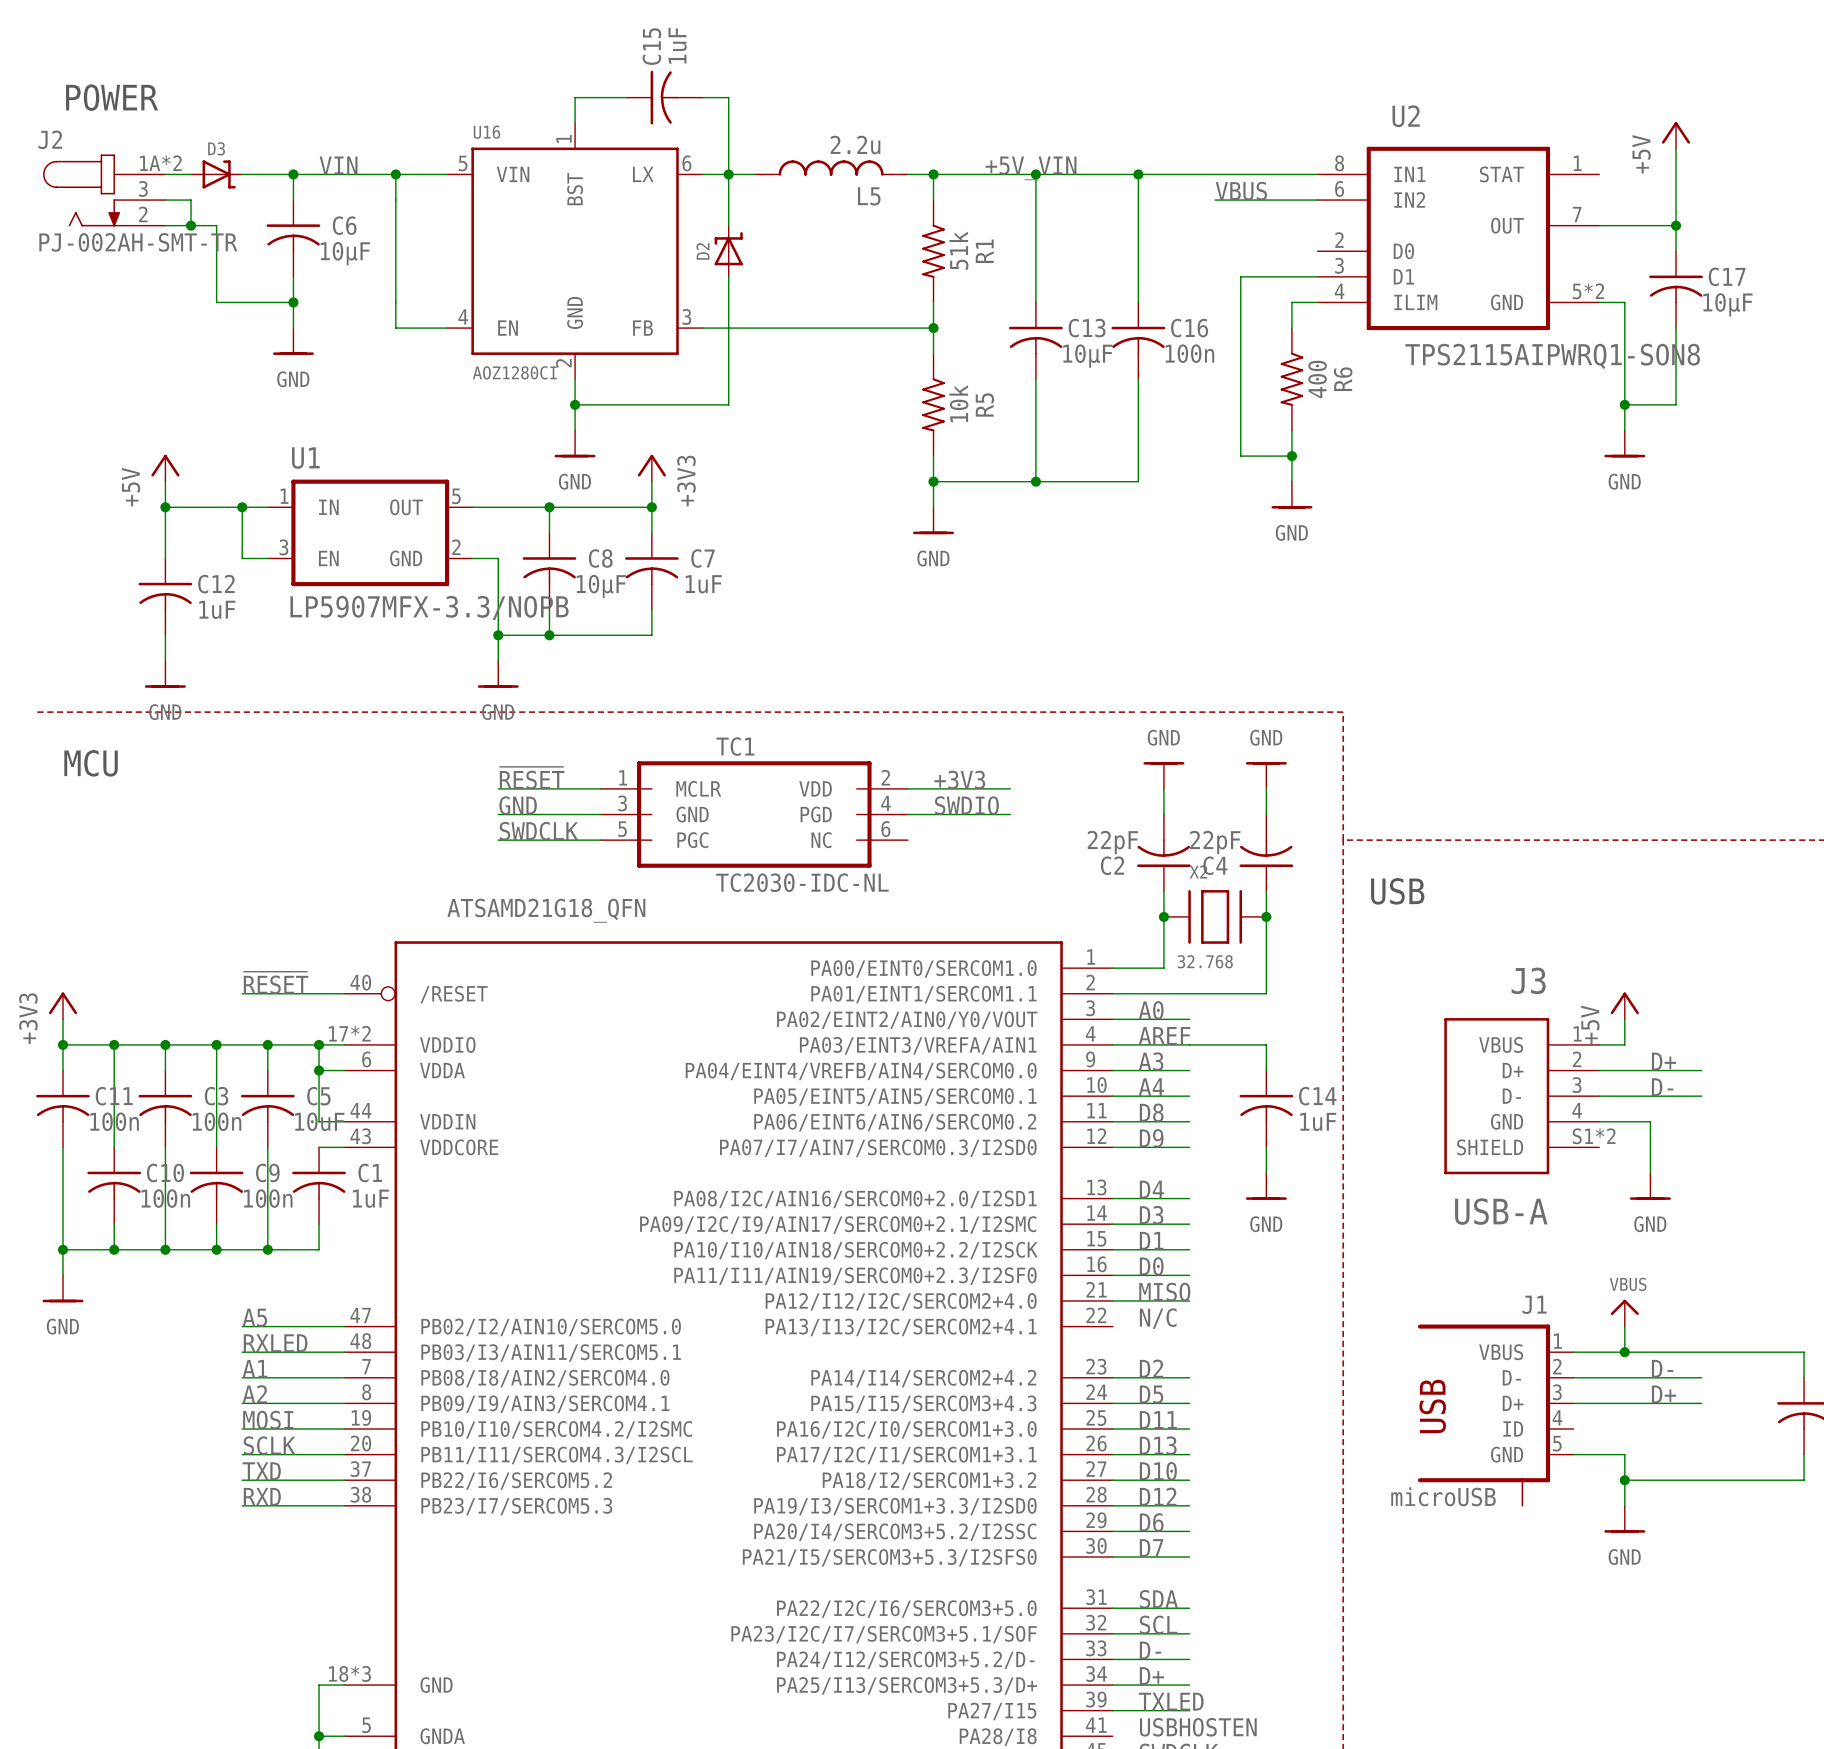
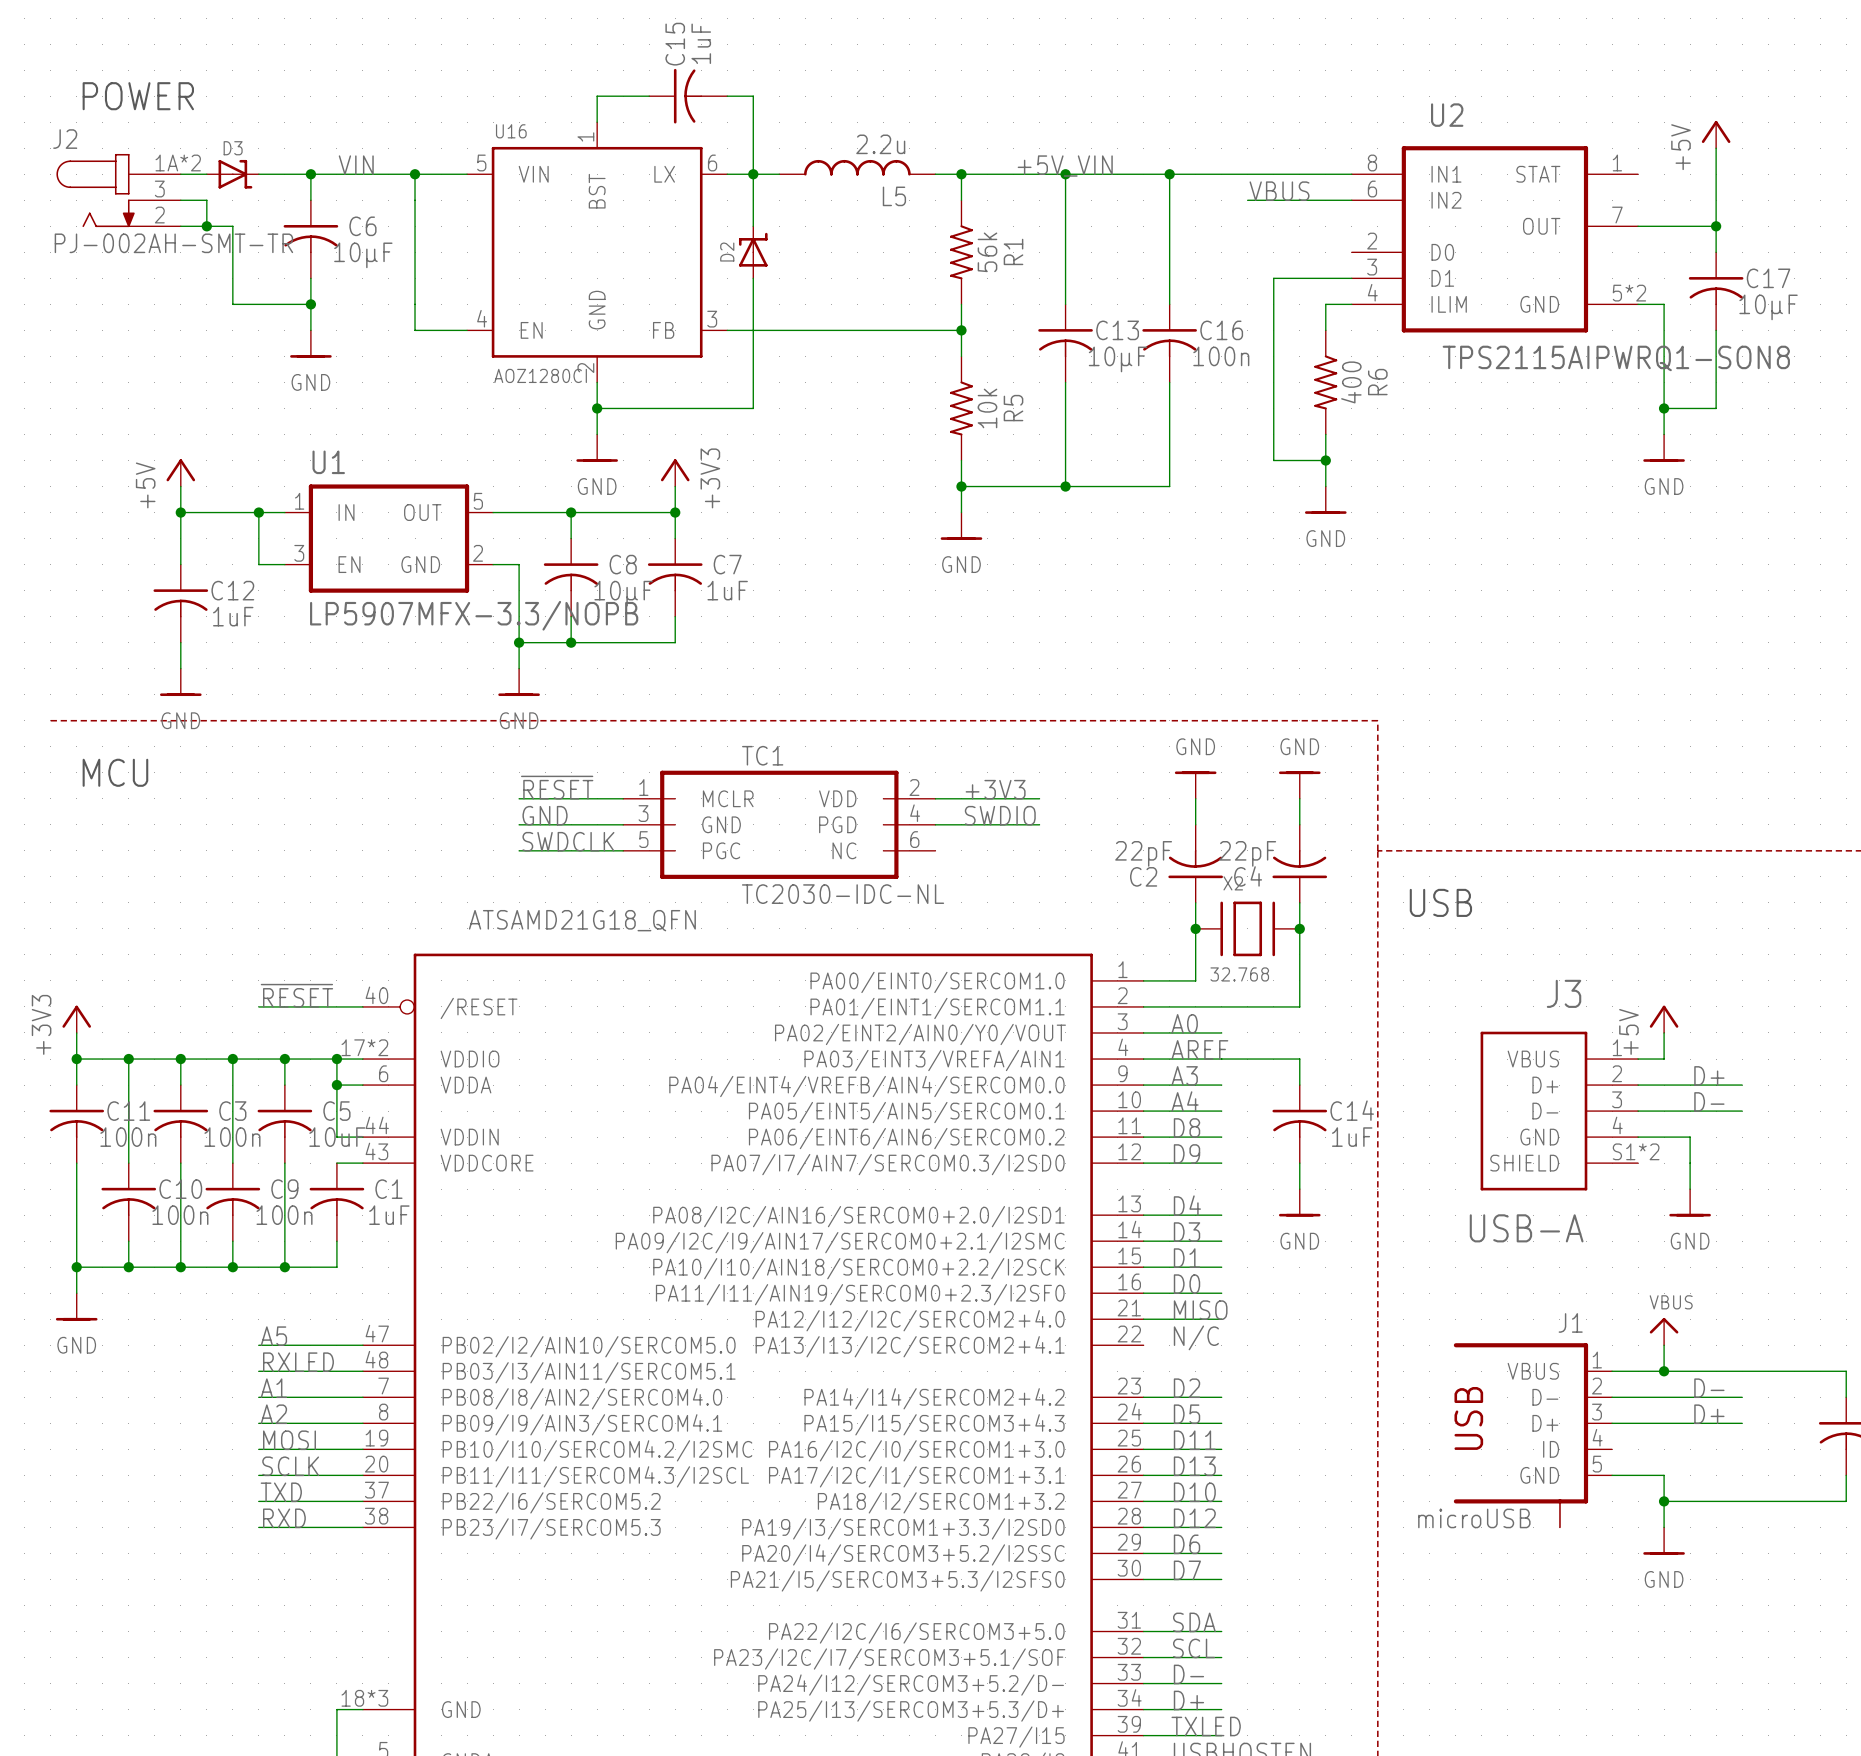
R1 value: 51k (958, 250) -> 56k (987, 252)

